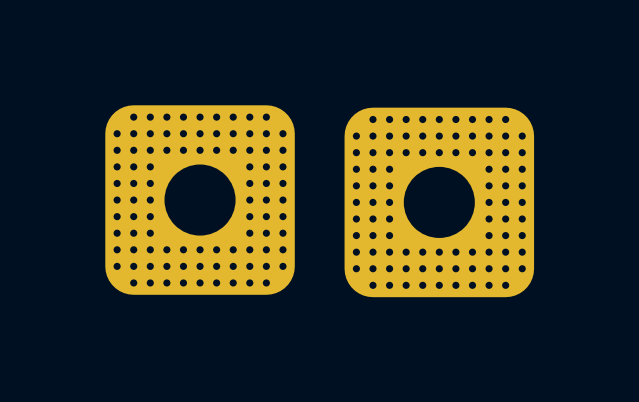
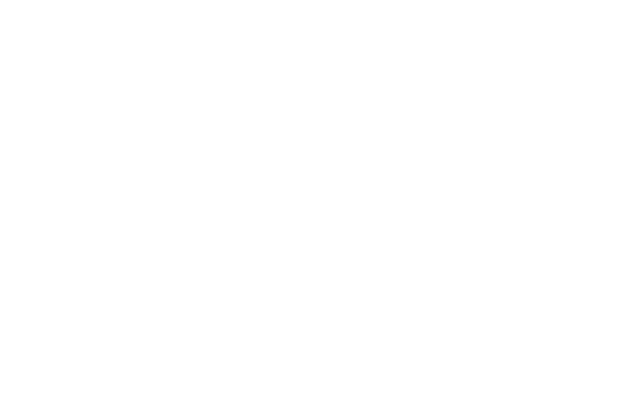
part: (200, 200) -> none
part: (439, 202) -> none

